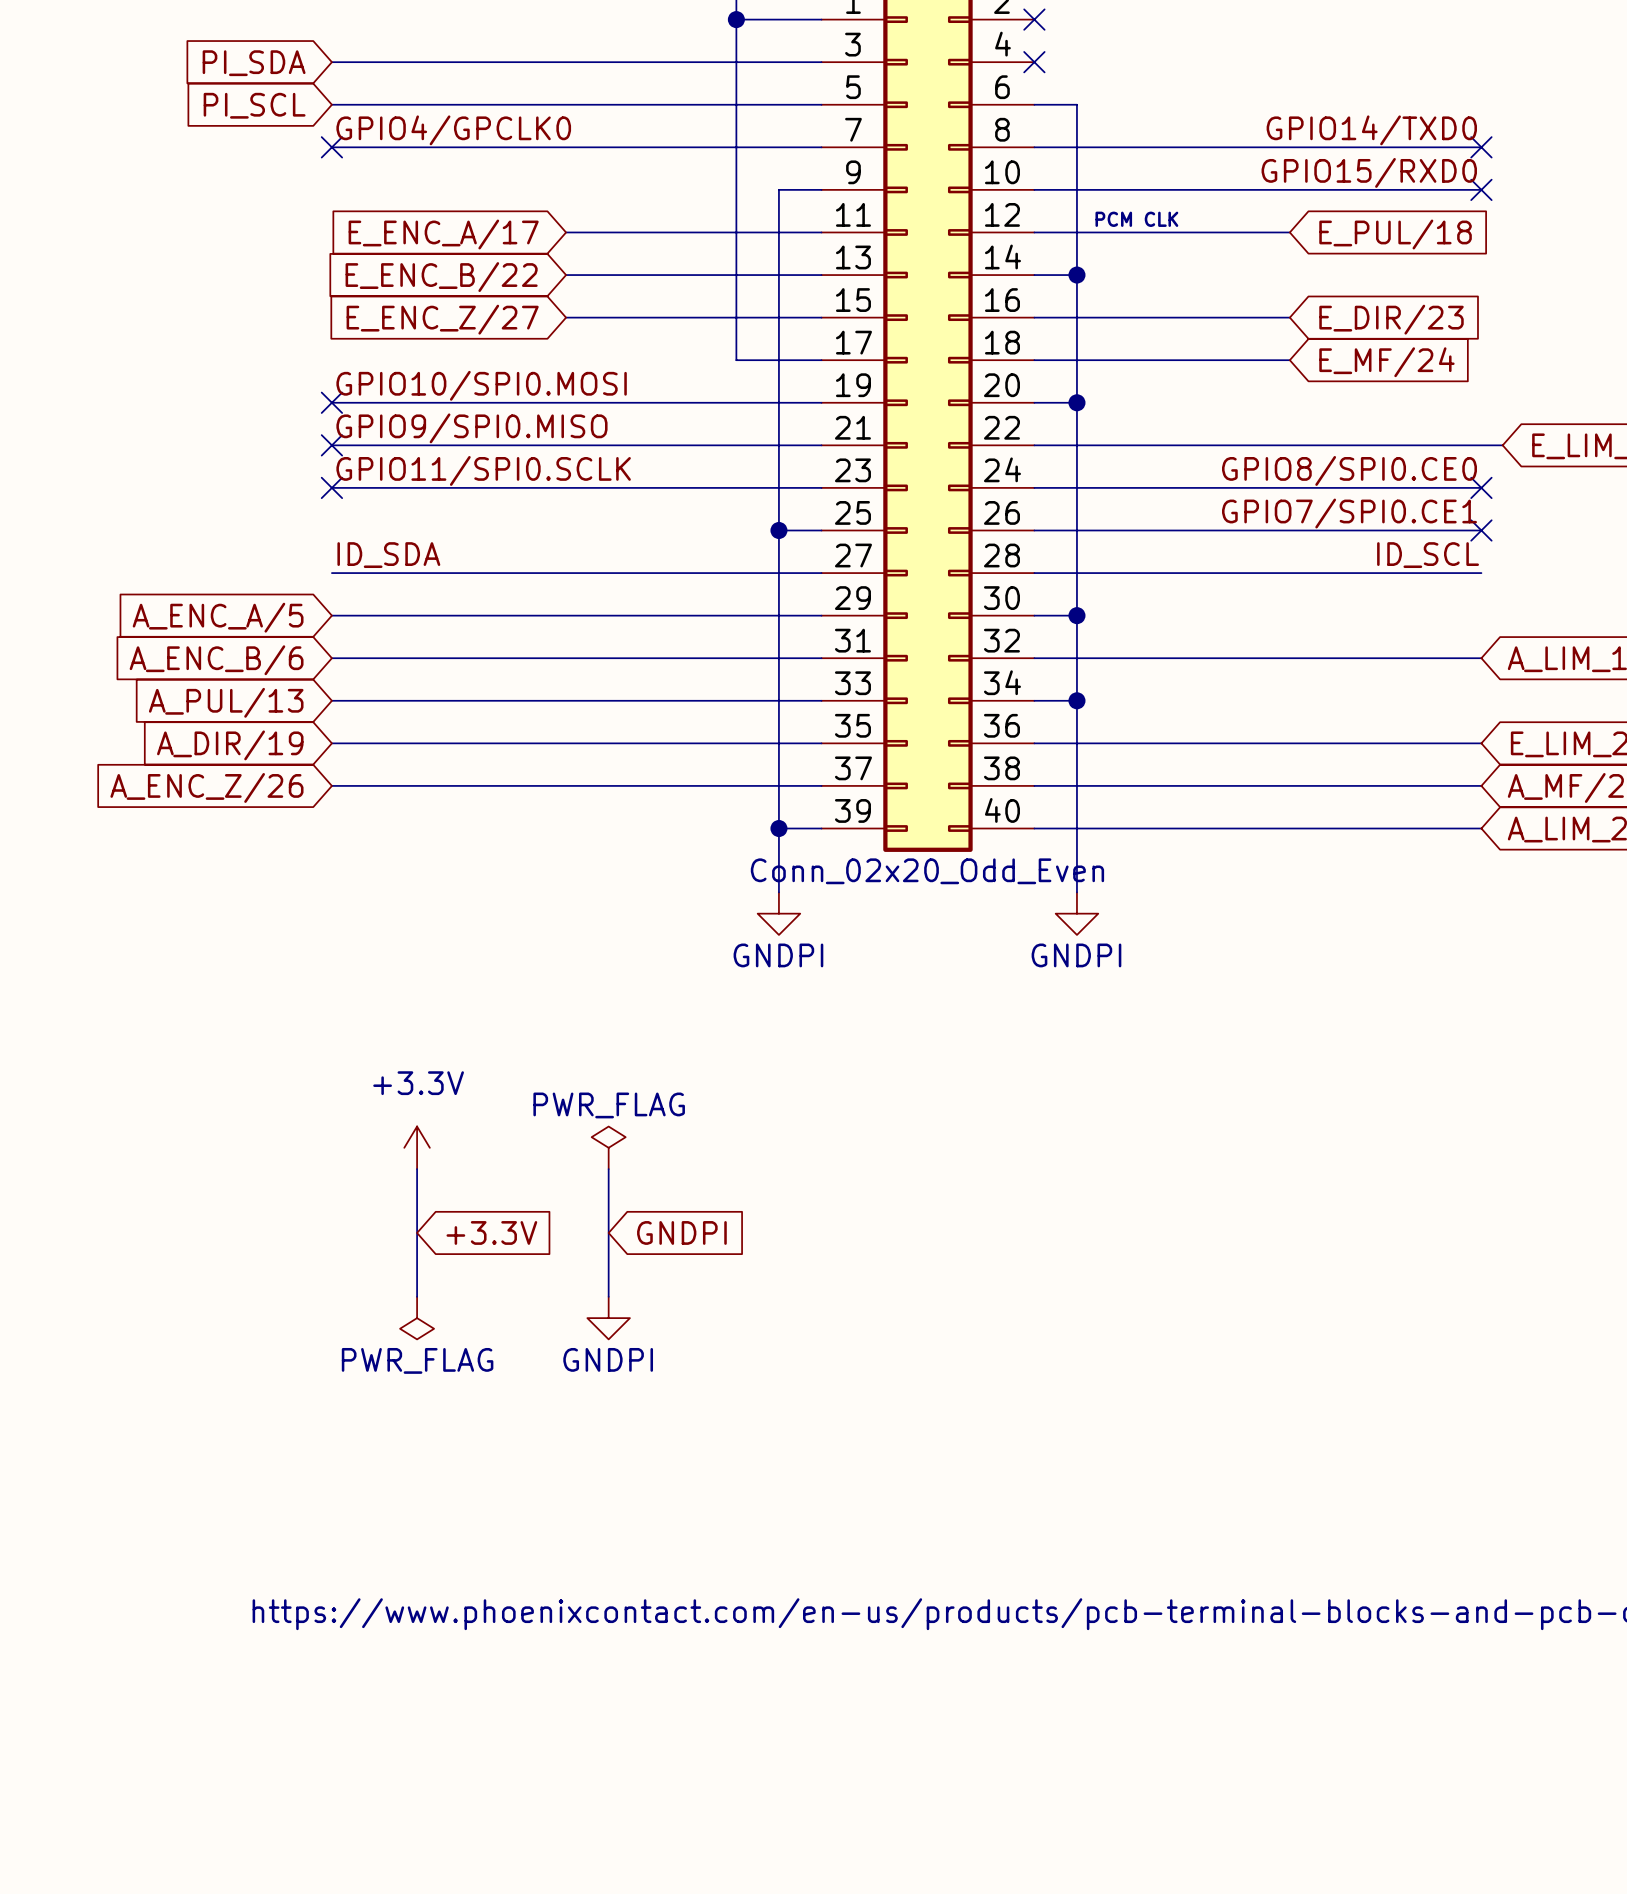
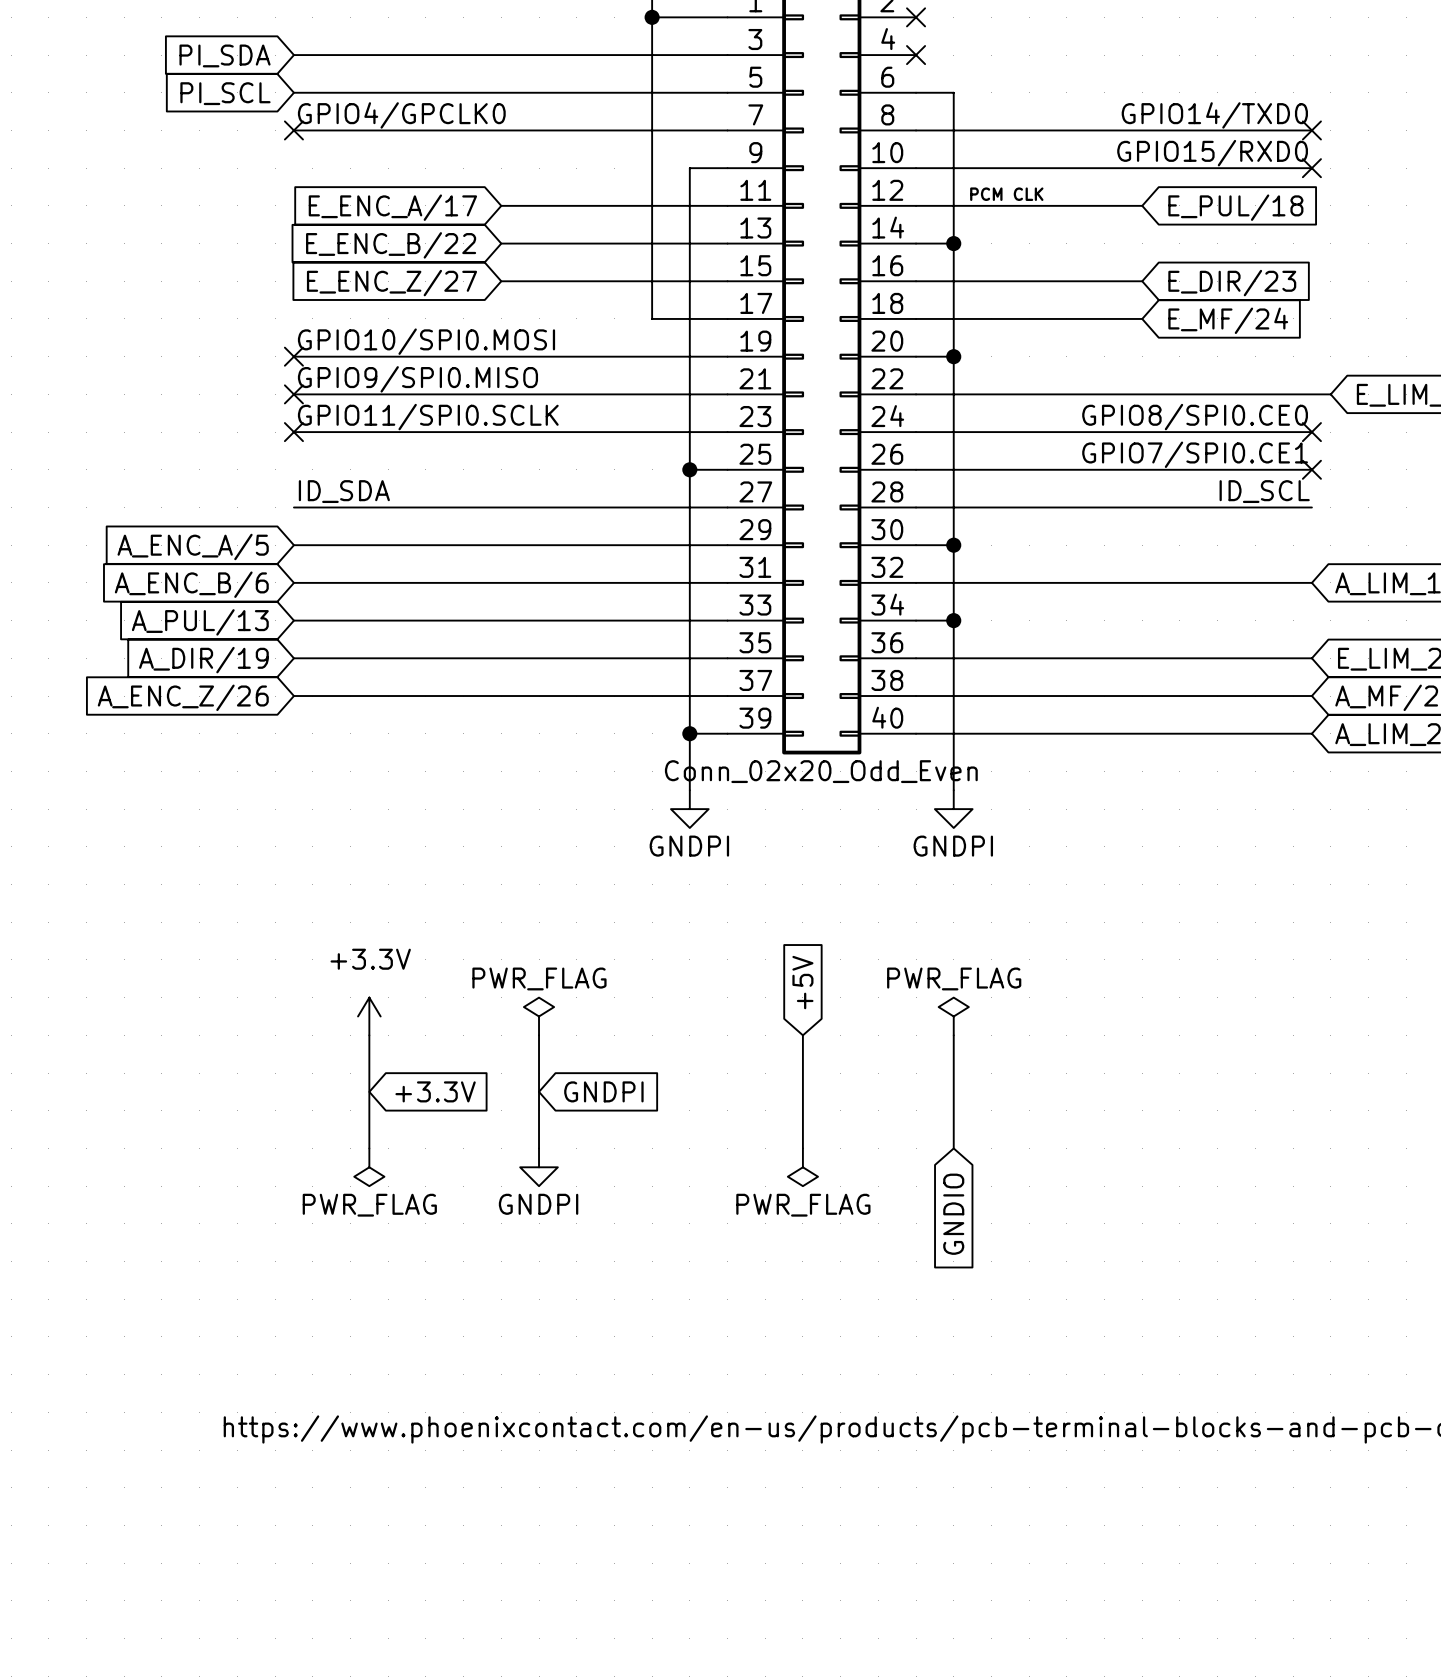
global label: none -> +5V (802, 982)
power symbol: none -> PWR_FLAG (953, 1016)
wire: none -> (802, 1035) (802, 1148)
wire: none -> (953, 1035) (953, 1148)
power symbol: none -> PWR_FLAG (802, 1167)
global label: none -> GNDIO (953, 1214)

